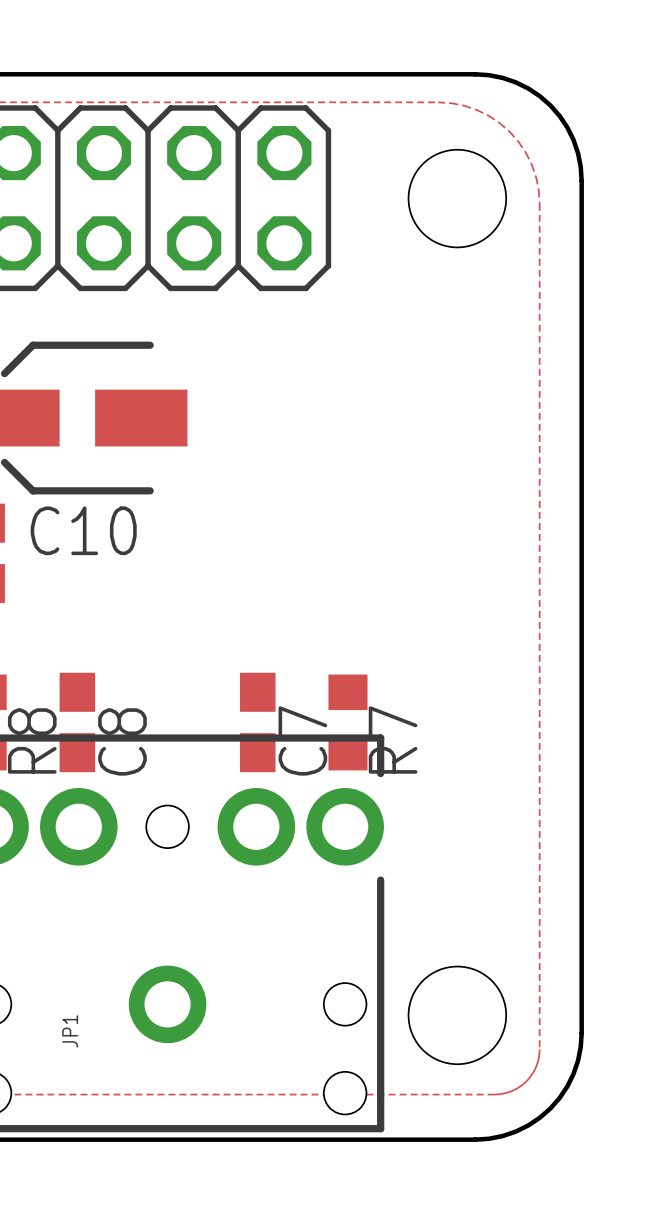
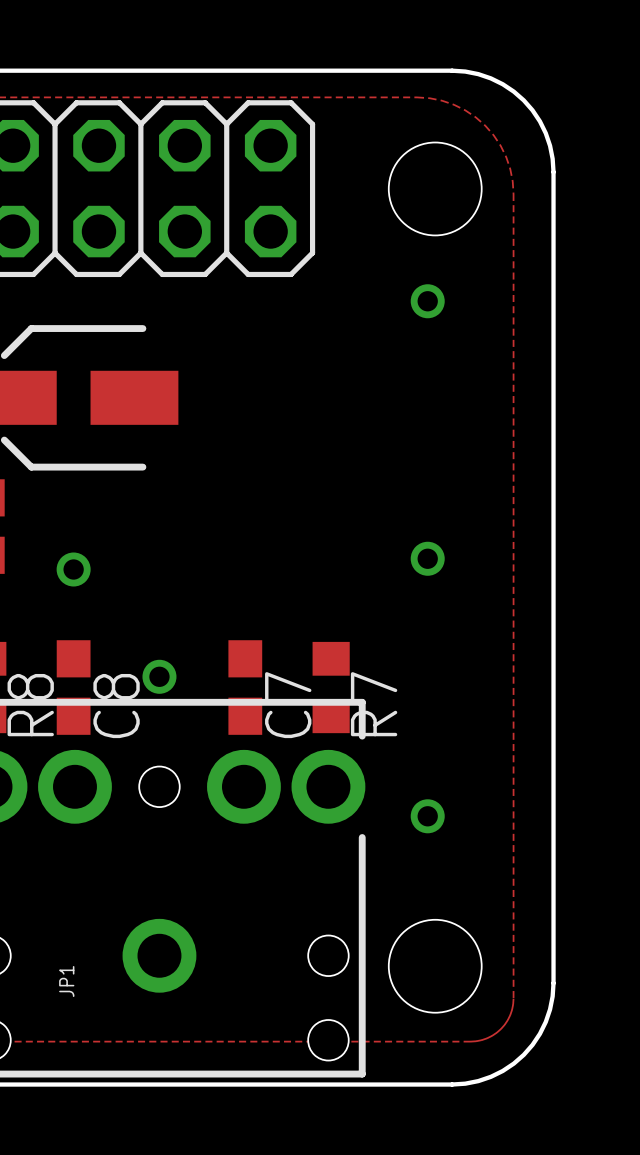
via: none -> (427, 301)
C10 name: C10 (83, 530) -> none
via: none -> (427, 558)
via: none -> (73, 569)
via: none -> (159, 676)
via: none -> (427, 816)

